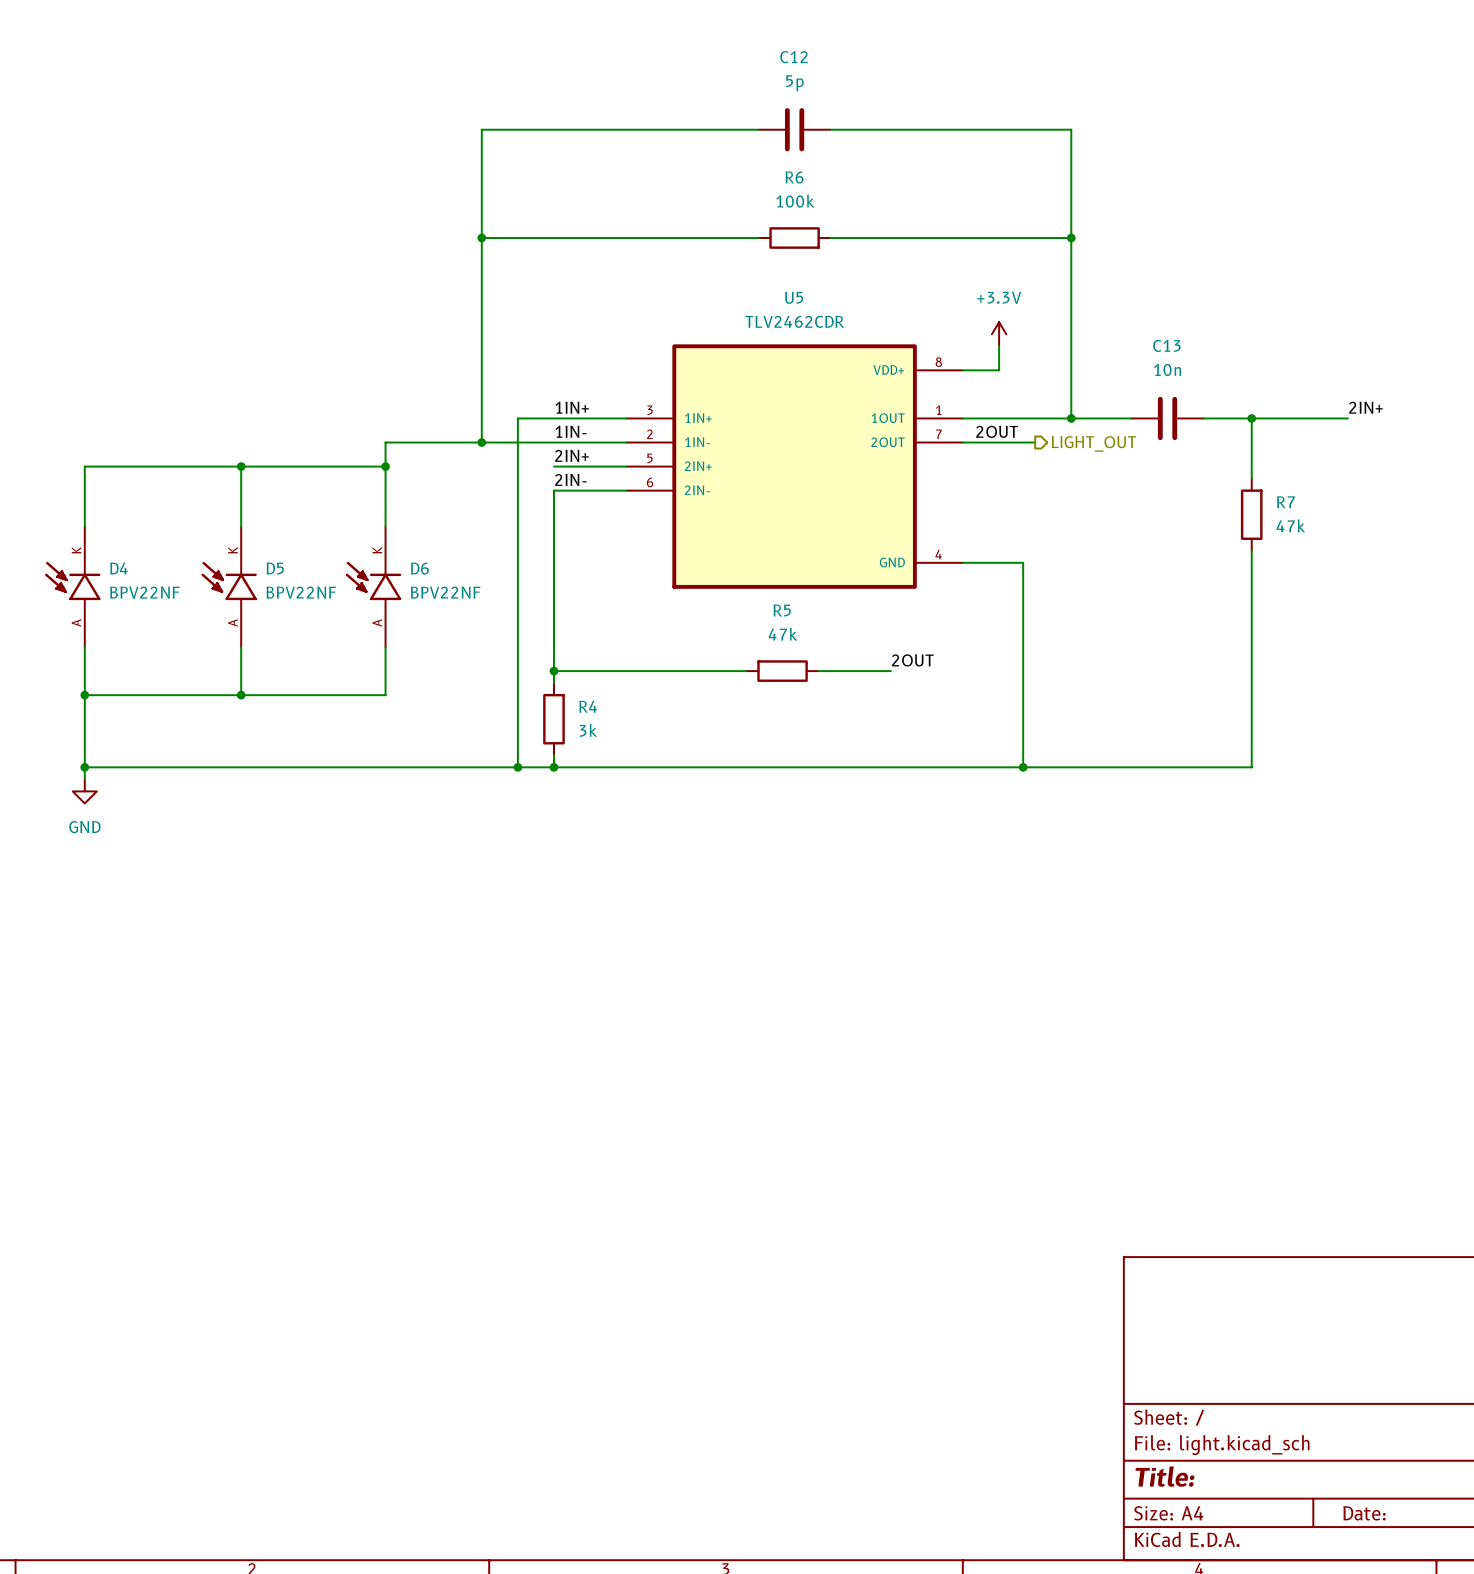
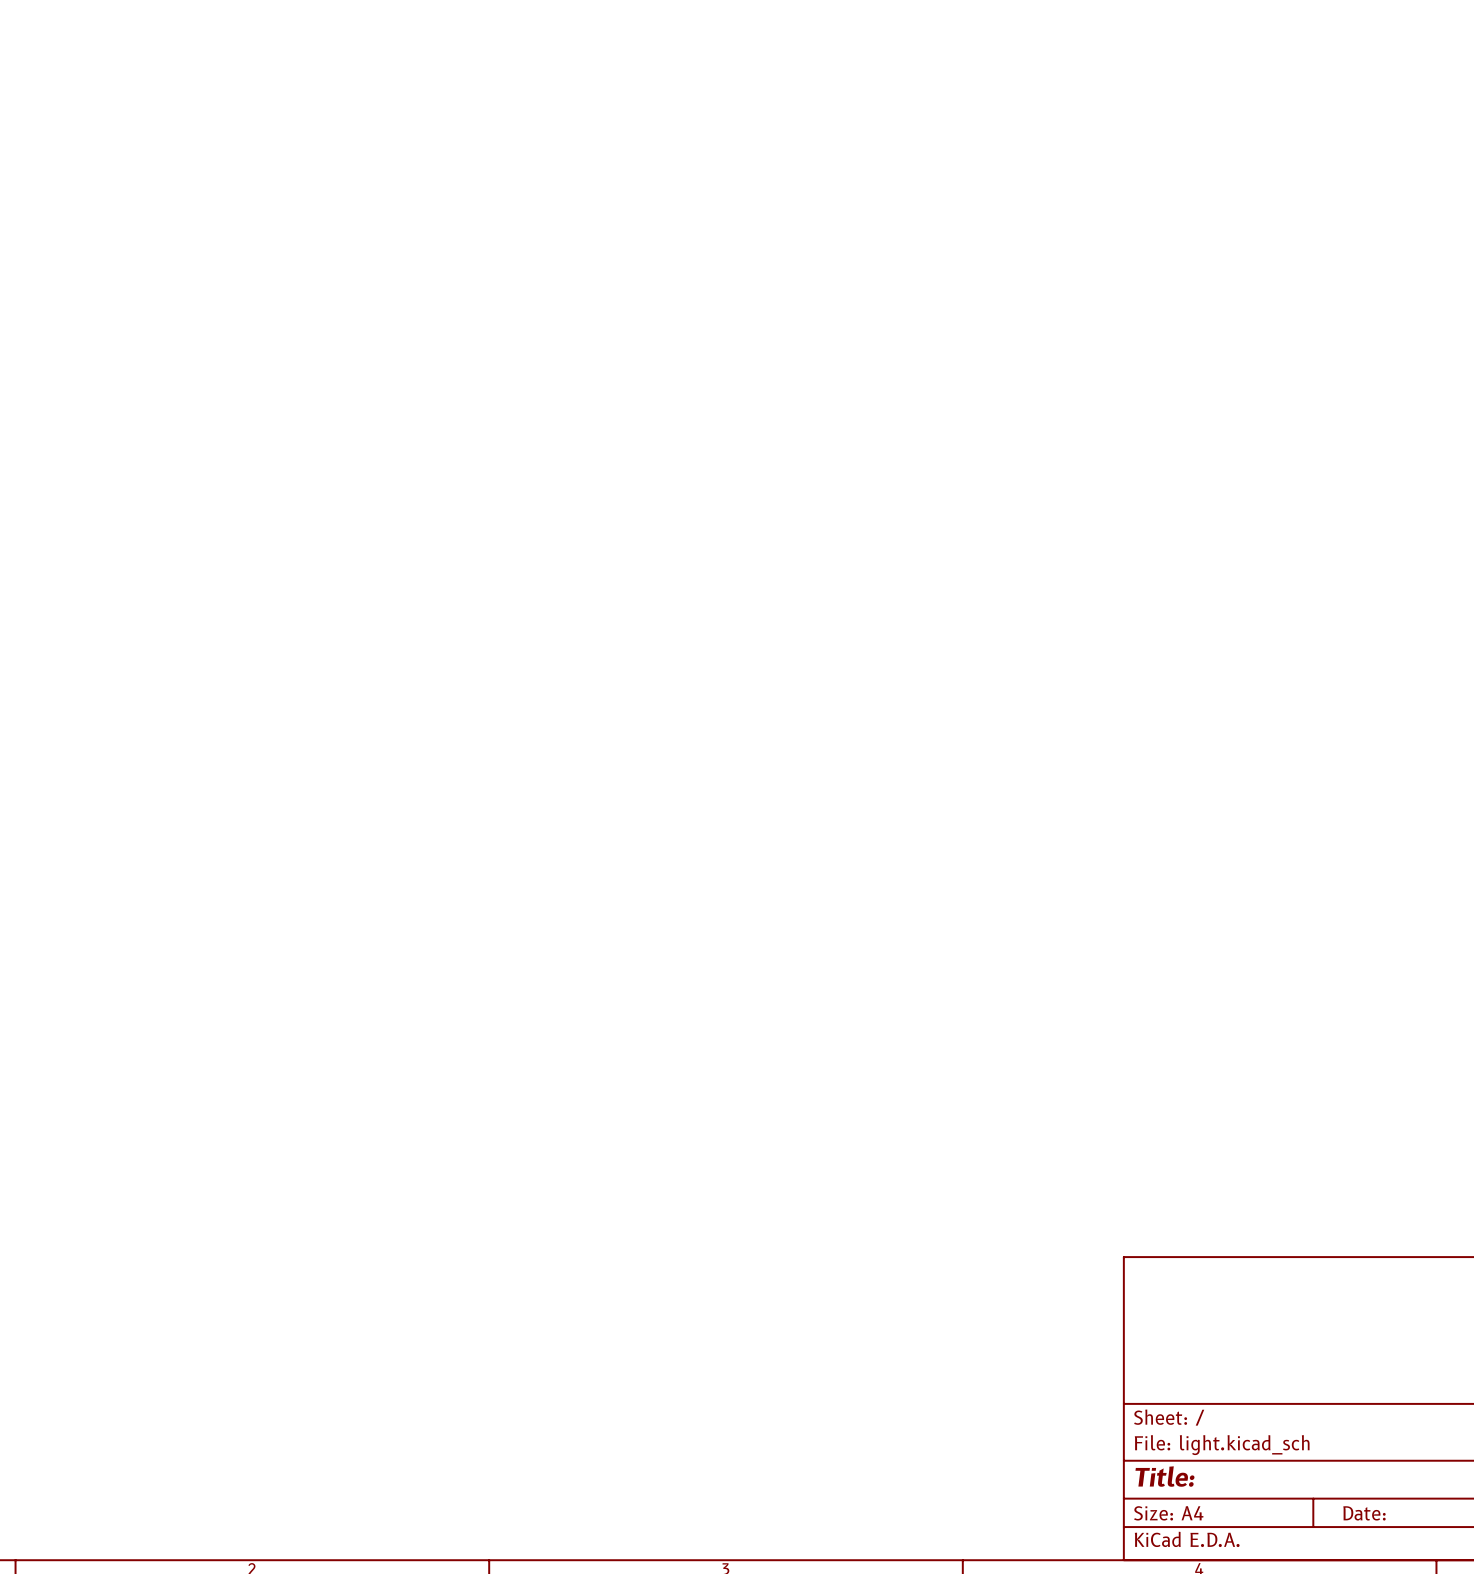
wire: (758, 129) (481, 129) (481, 442) -> none
C12: 5p (794, 129) -> none
wire: (830, 129) (1071, 129) (1071, 418) -> none
wire: (481, 238) (758, 238) -> none
junction: (481, 238) -> none
R6: 100k (794, 238) -> none
wire: (830, 238) (1071, 238) -> none
junction: (1071, 238) -> none
power symbol: +3.3V (999, 334) -> none
wire: (999, 346) (999, 370) (963, 370) -> none
label: 1IN+ (572, 407) -> none
label: 2IN+ (1366, 407) -> none
wire: (626, 418) (517, 418) (517, 767) -> none
wire: (963, 418) (1131, 418) -> none
junction: (1071, 418) -> none
C13: 10n (1167, 418) -> none
wire: (1203, 418) (1347, 418) -> none
wire: (1251, 418) (1251, 478) -> none
junction: (1251, 418) -> none
label: 1IN- (570, 431) -> none
label: 2OUT (997, 431) -> none
junction: (481, 442) -> none
wire: (626, 442) (385, 442) (385, 526) -> none
wire: (963, 442) (1035, 442) -> none
hierarchical label: LIGHT_OUT (1093, 443) -> none
label: 2IN+ (571, 455) -> none
wire: (241, 466) (241, 526) -> none
junction: (241, 466) -> none
wire: (385, 466) (84, 466) (84, 526) -> none
junction: (385, 466) -> none
wire: (553, 466) (626, 466) -> none
U5: TLV2462CDR (794, 466) -> none
label: 2IN- (570, 479) -> none
wire: (626, 490) (553, 490) (553, 683) -> none
R7: 47k (1251, 514) -> none
wire: (1251, 550) (1251, 767) (84, 767) -> none
wire: (963, 562) (1023, 562) (1023, 767) -> none
D4: BPV22NF (72, 586) -> none
D5: BPV22NF (229, 586) -> none
D6: BPV22NF (373, 586) -> none
wire: (84, 647) (84, 779) -> none
wire: (241, 647) (241, 695) -> none
wire: (385, 647) (385, 695) (84, 695) -> none
label: 2OUT (912, 660) -> none
wire: (553, 671) (746, 671) -> none
junction: (553, 671) -> none
R5: 47k (782, 671) -> none
wire: (818, 671) (890, 671) -> none
junction: (84, 695) -> none
junction: (241, 695) -> none
R4: 3k (553, 719) -> none
wire: (553, 755) (553, 767) -> none
junction: (84, 767) -> none
junction: (517, 767) -> none
junction: (553, 767) -> none
junction: (1023, 767) -> none
power symbol: GND (84, 791) -> none

